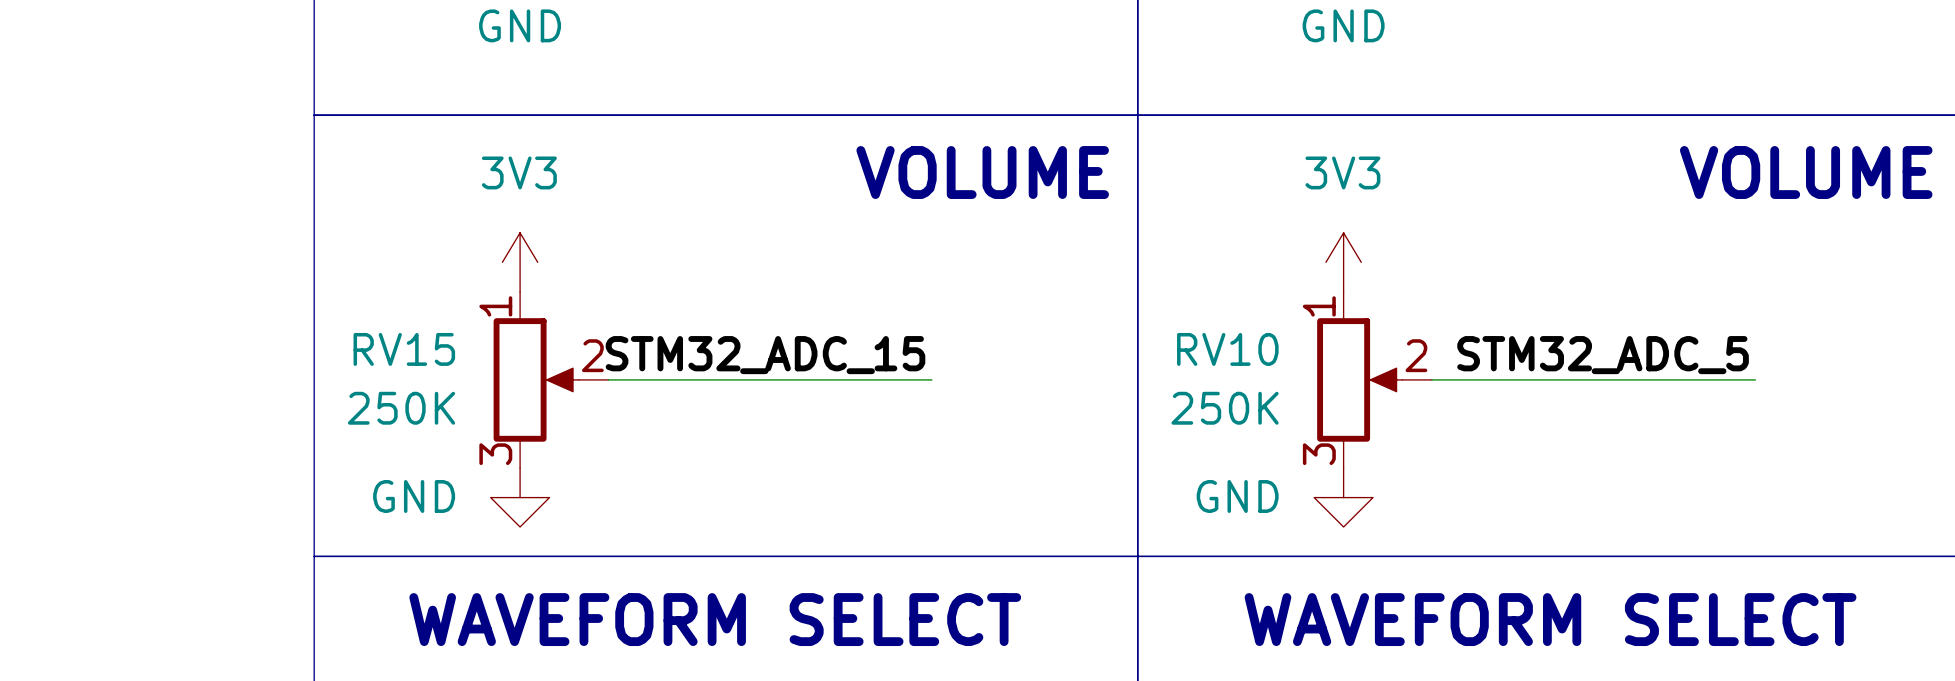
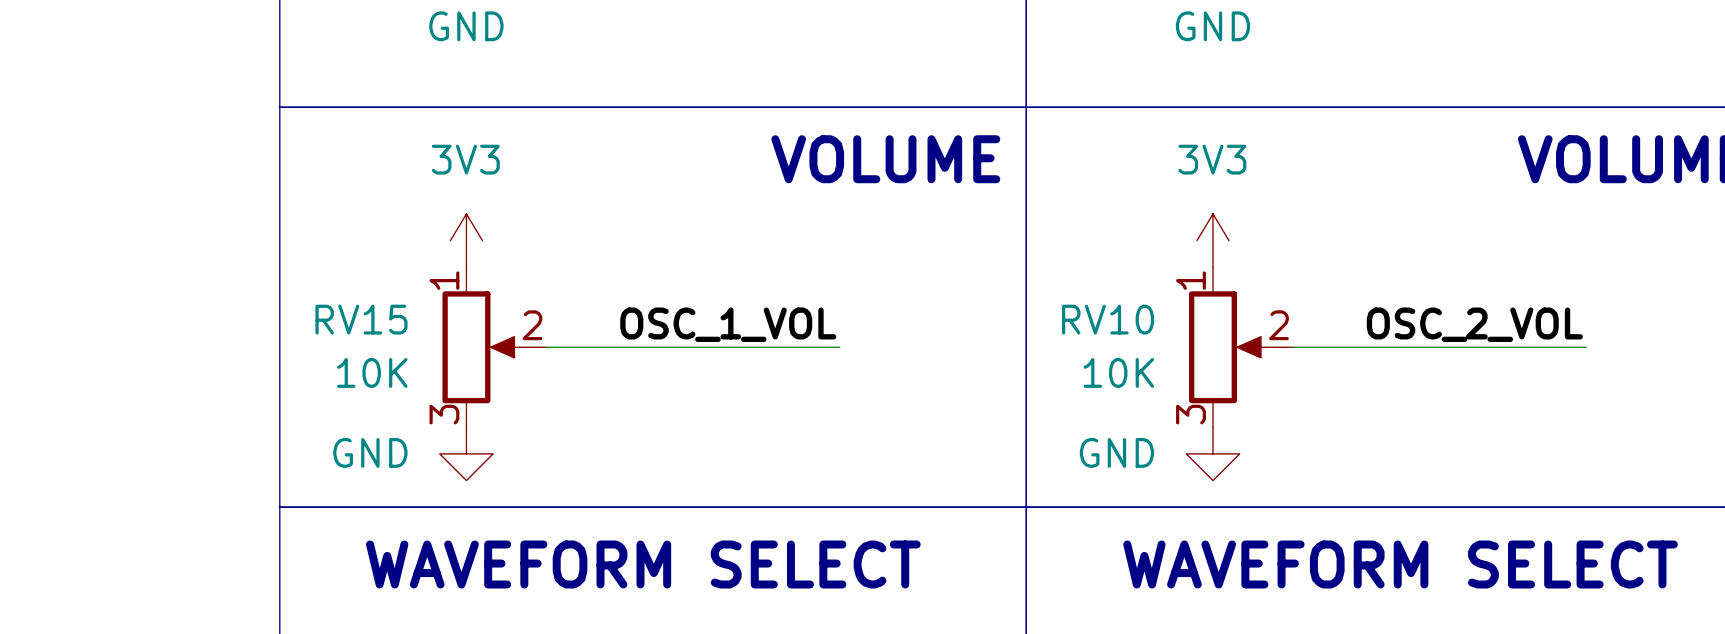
label: STM32_ADC_15 (765, 355) -> OSC_1_VOL (728, 324)
label: STM32_ADC_5 (1603, 355) -> OSC_2_VOL (1474, 324)
RV15 value: 250K (401, 408) -> 10K (372, 372)
RV10 value: 250K (1225, 408) -> 10K (1118, 372)

